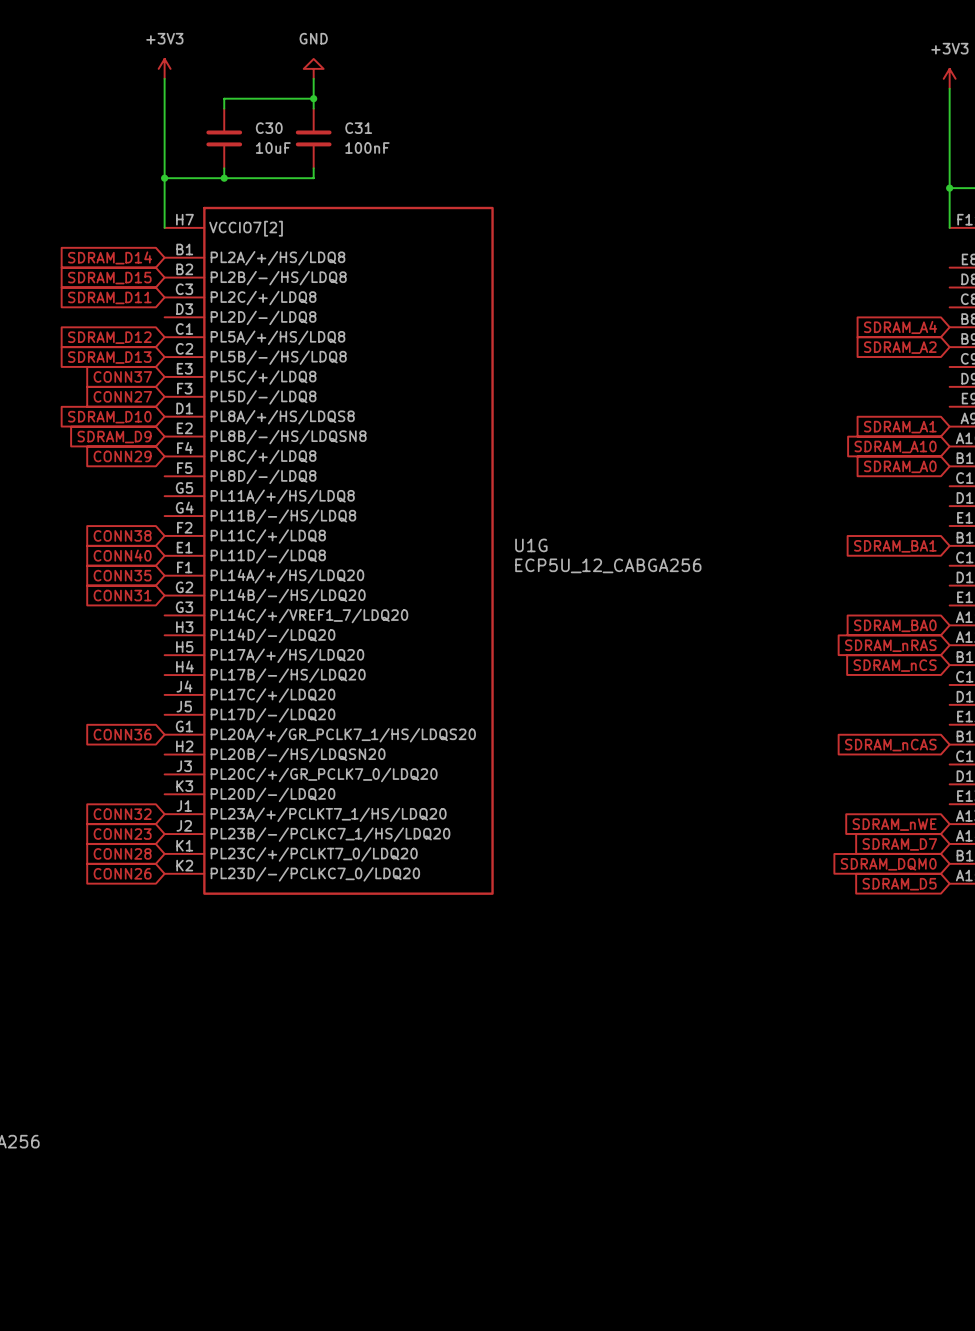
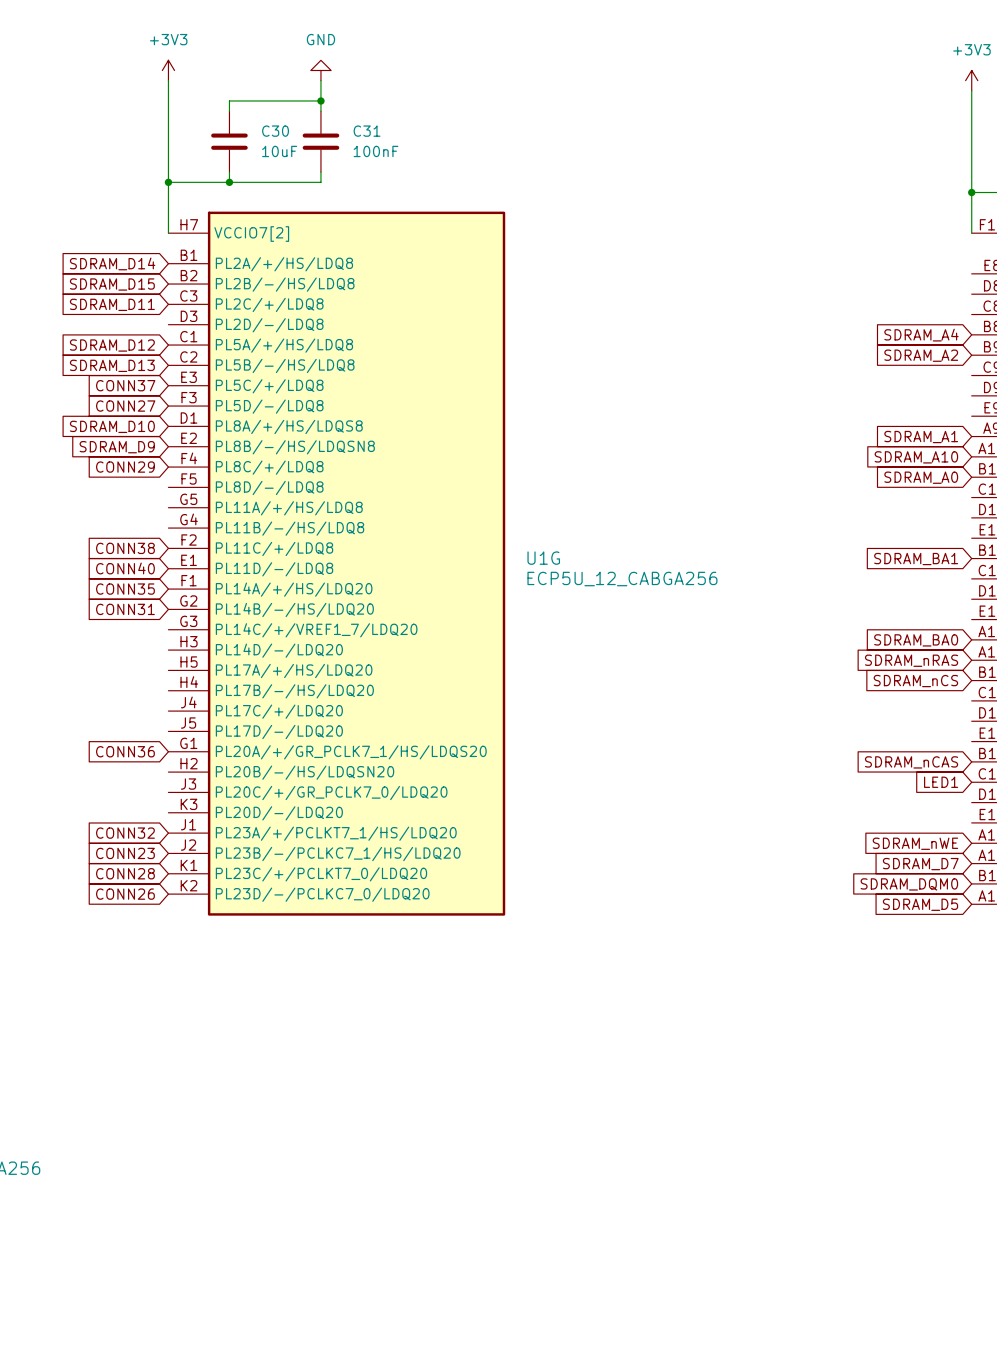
global label: none -> LED1 (941, 782)

